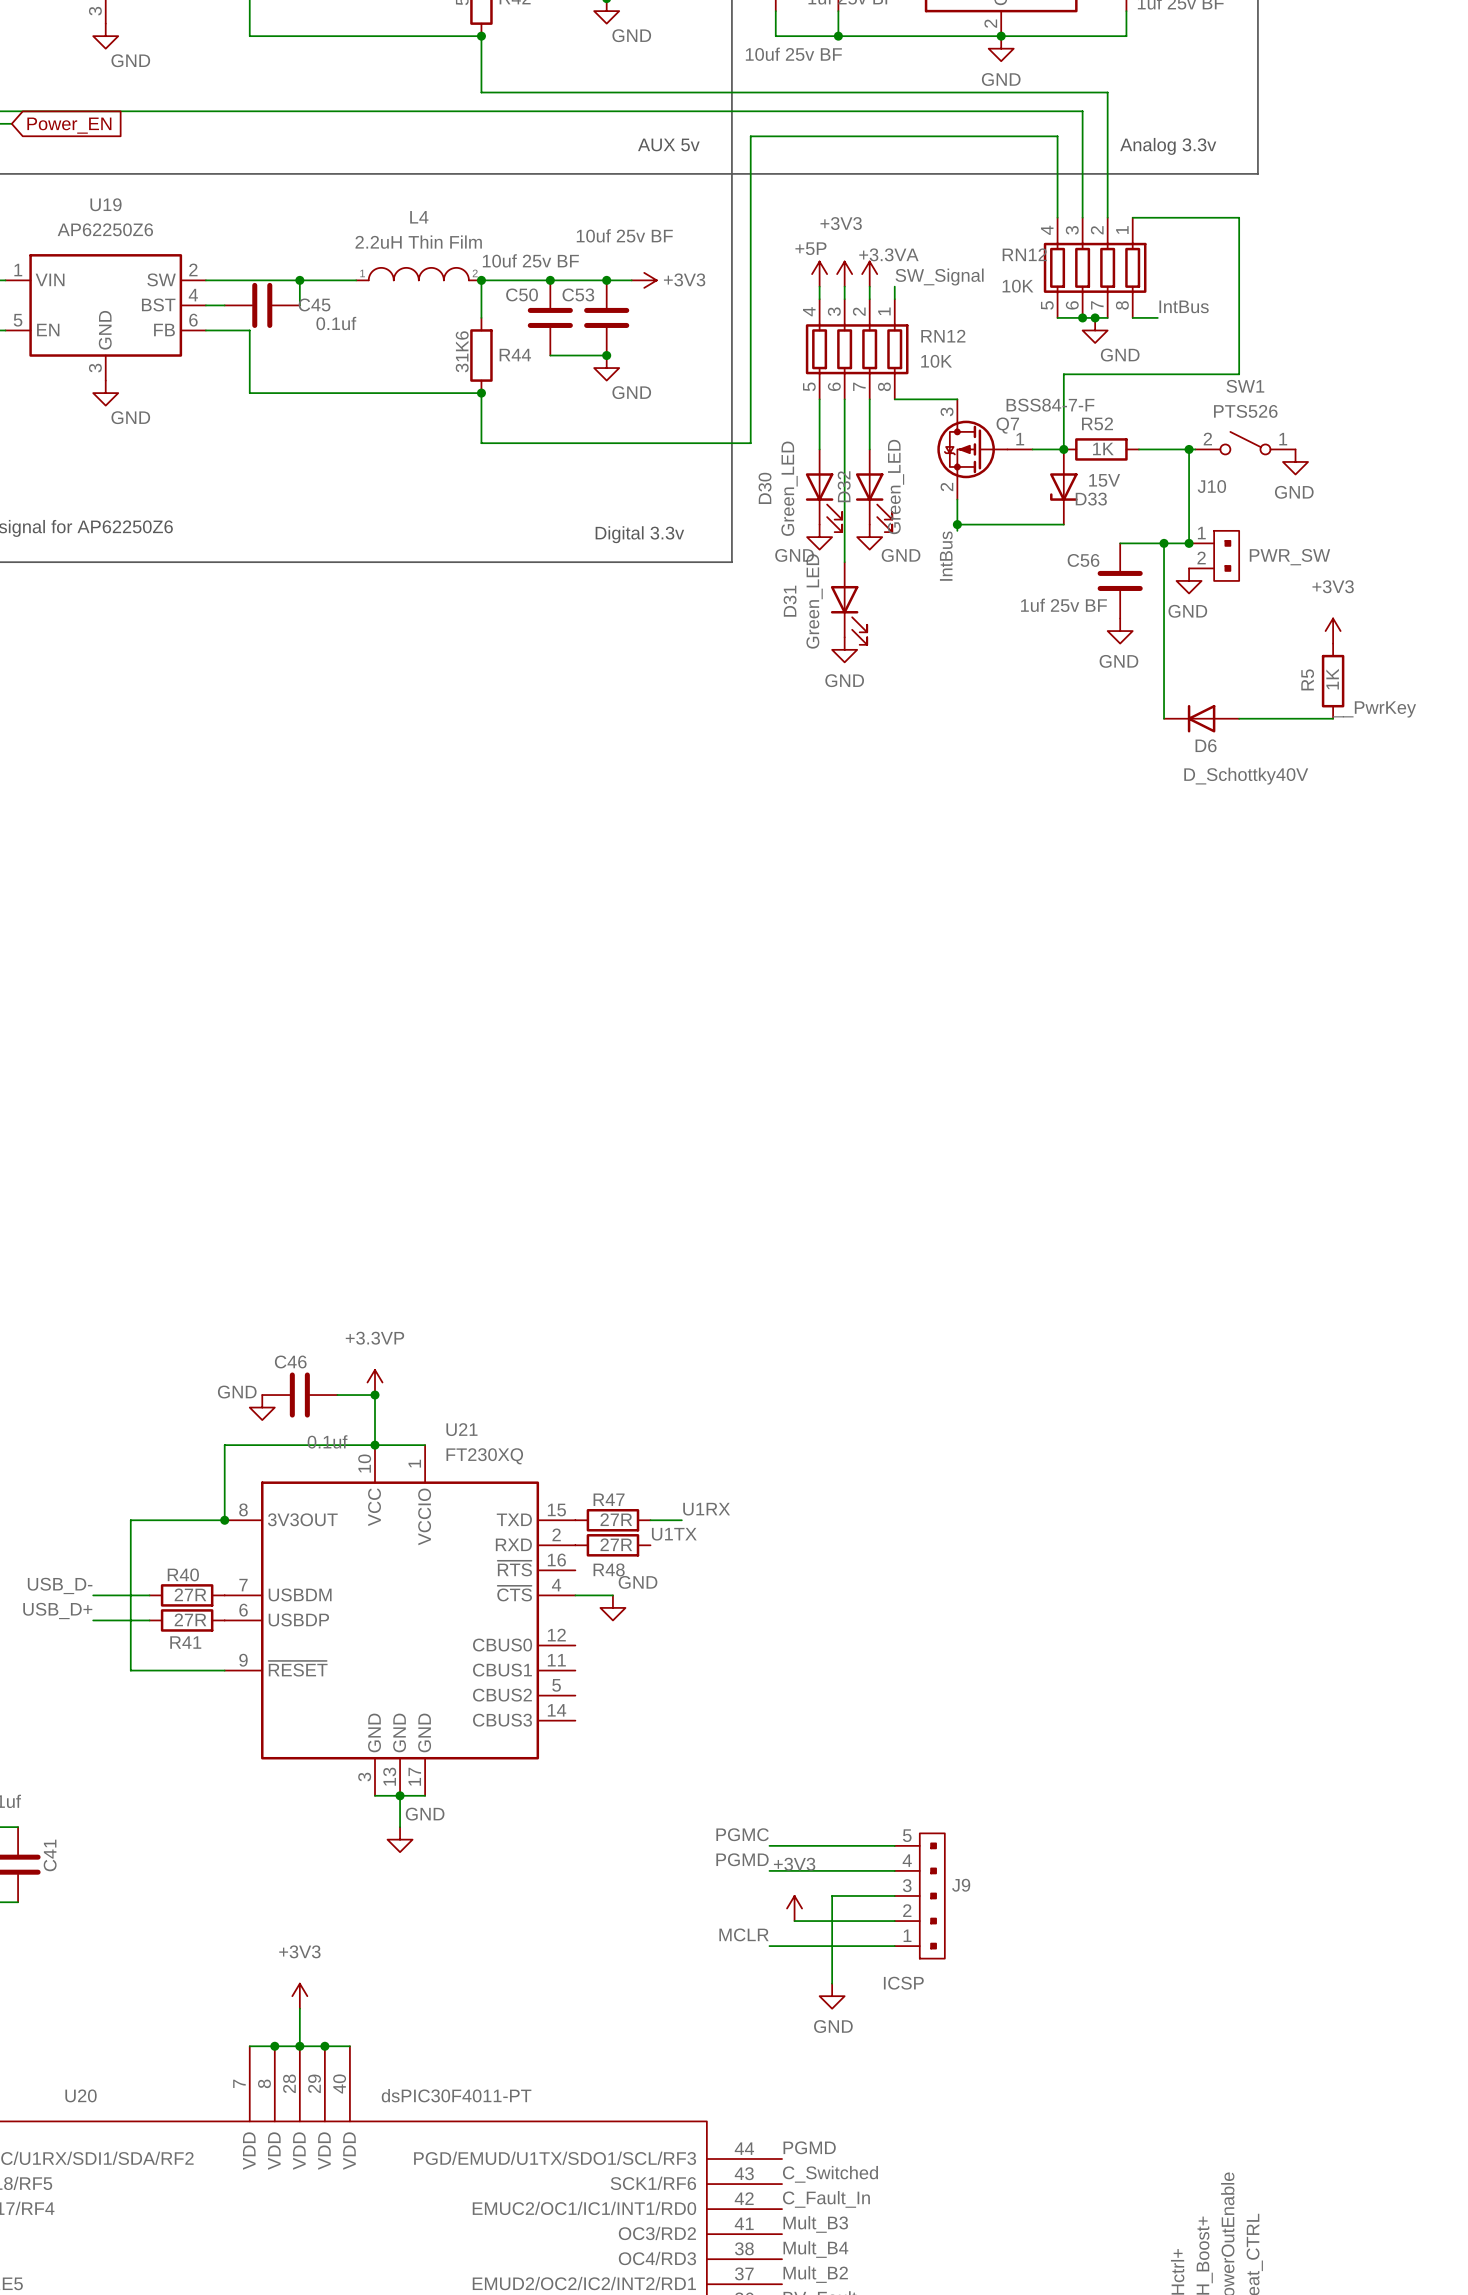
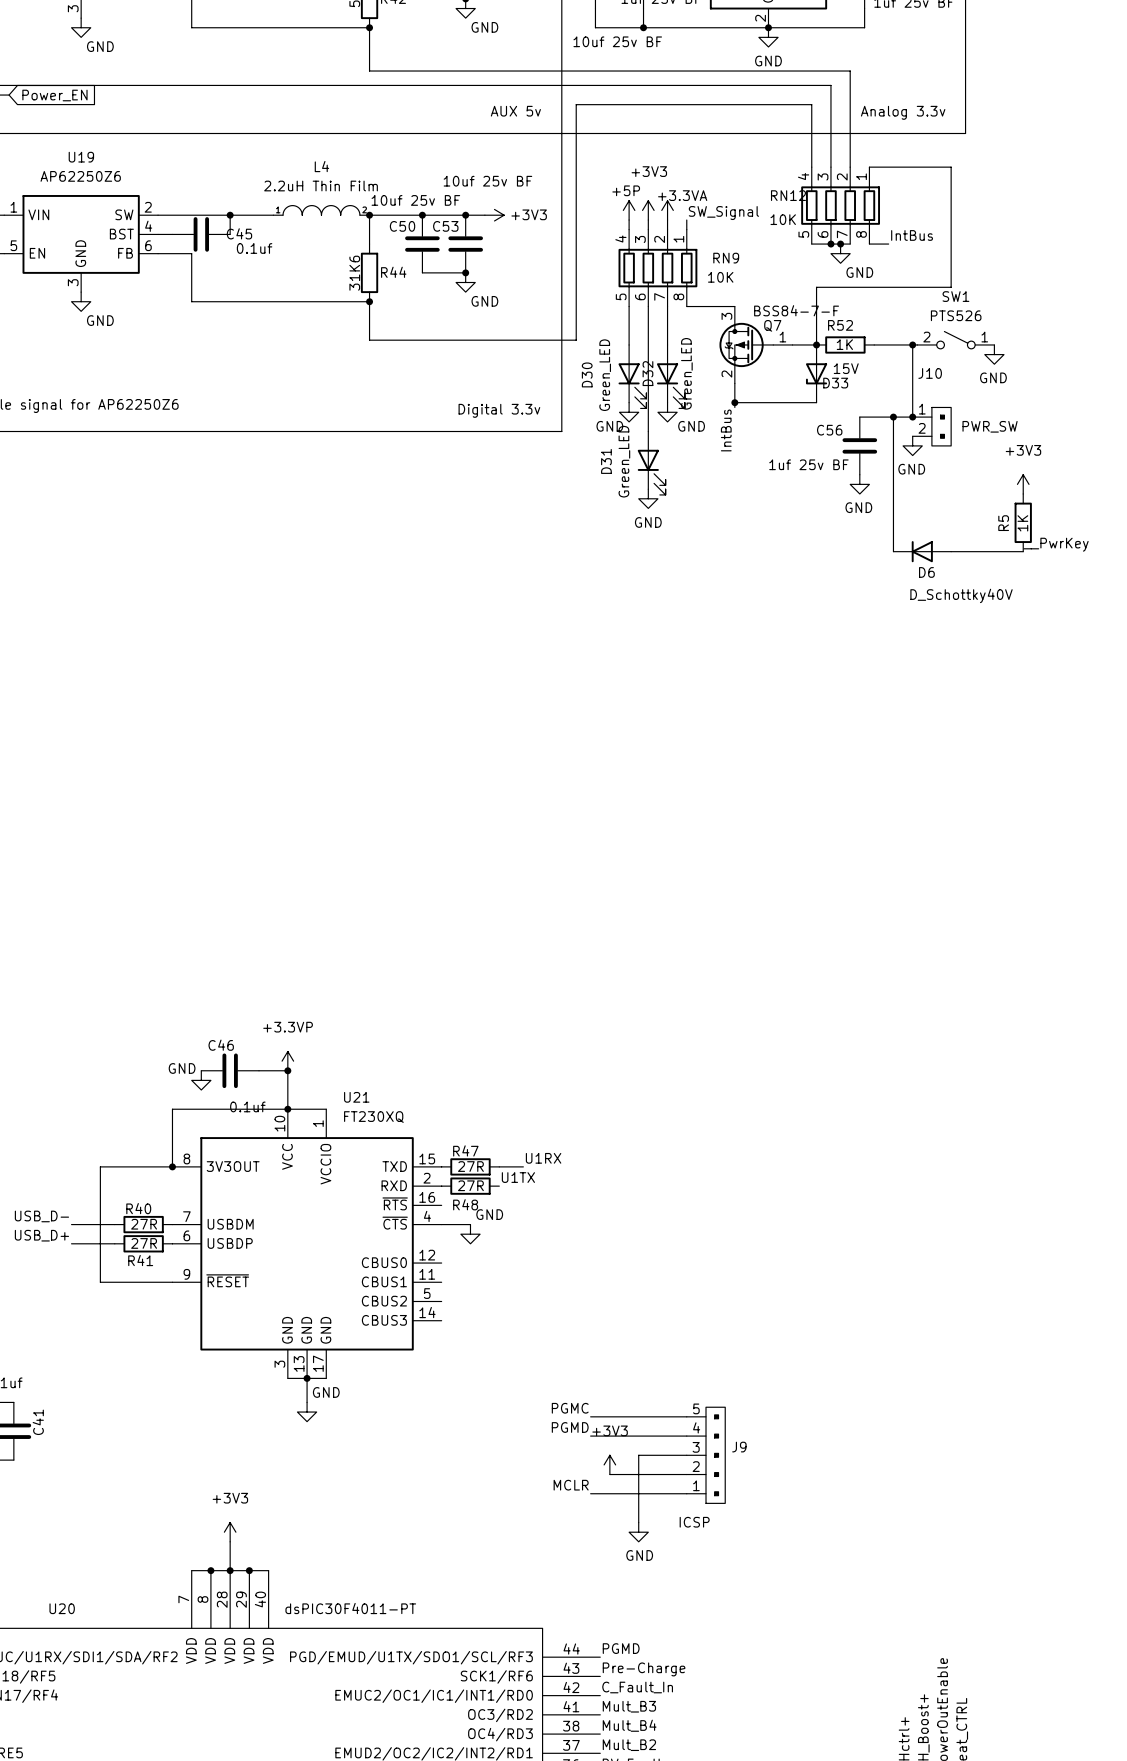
RN12 name: RN12 (943, 336) -> RN9 (726, 258)
label: C_Switched (830, 2174) -> Pre-Charge (644, 1669)

